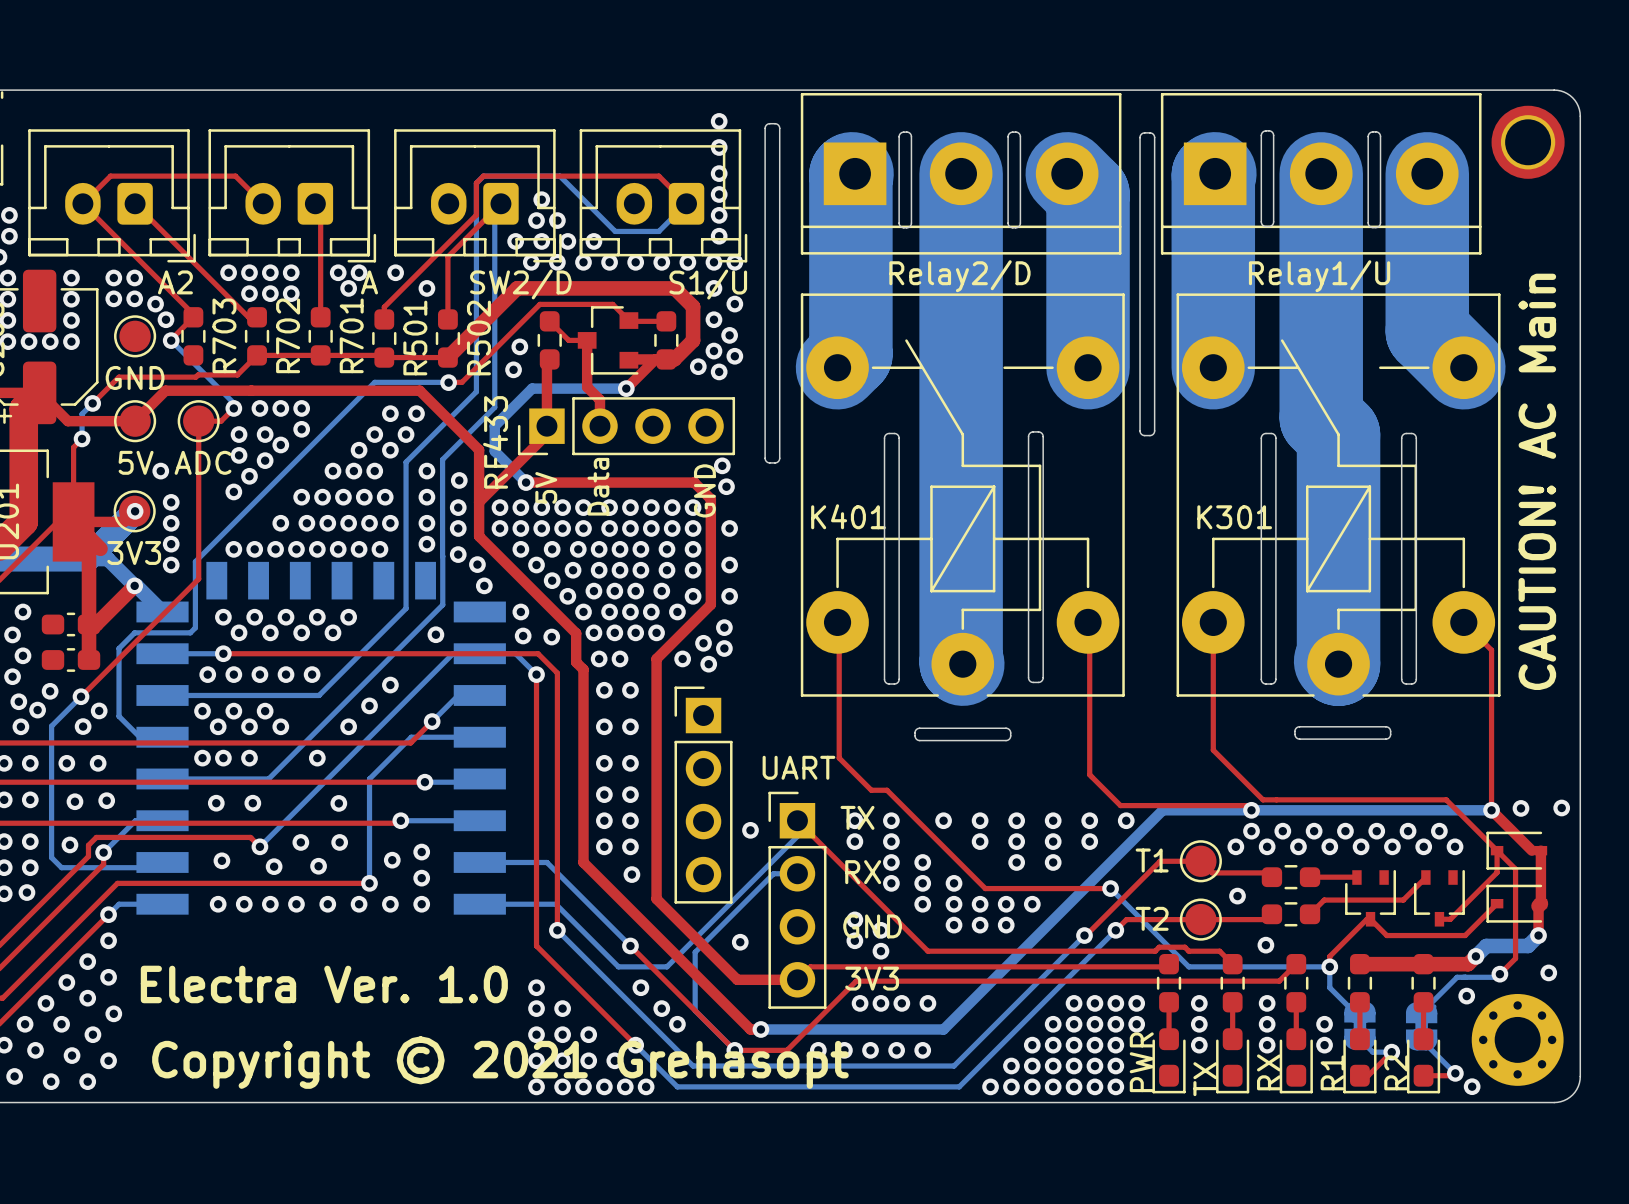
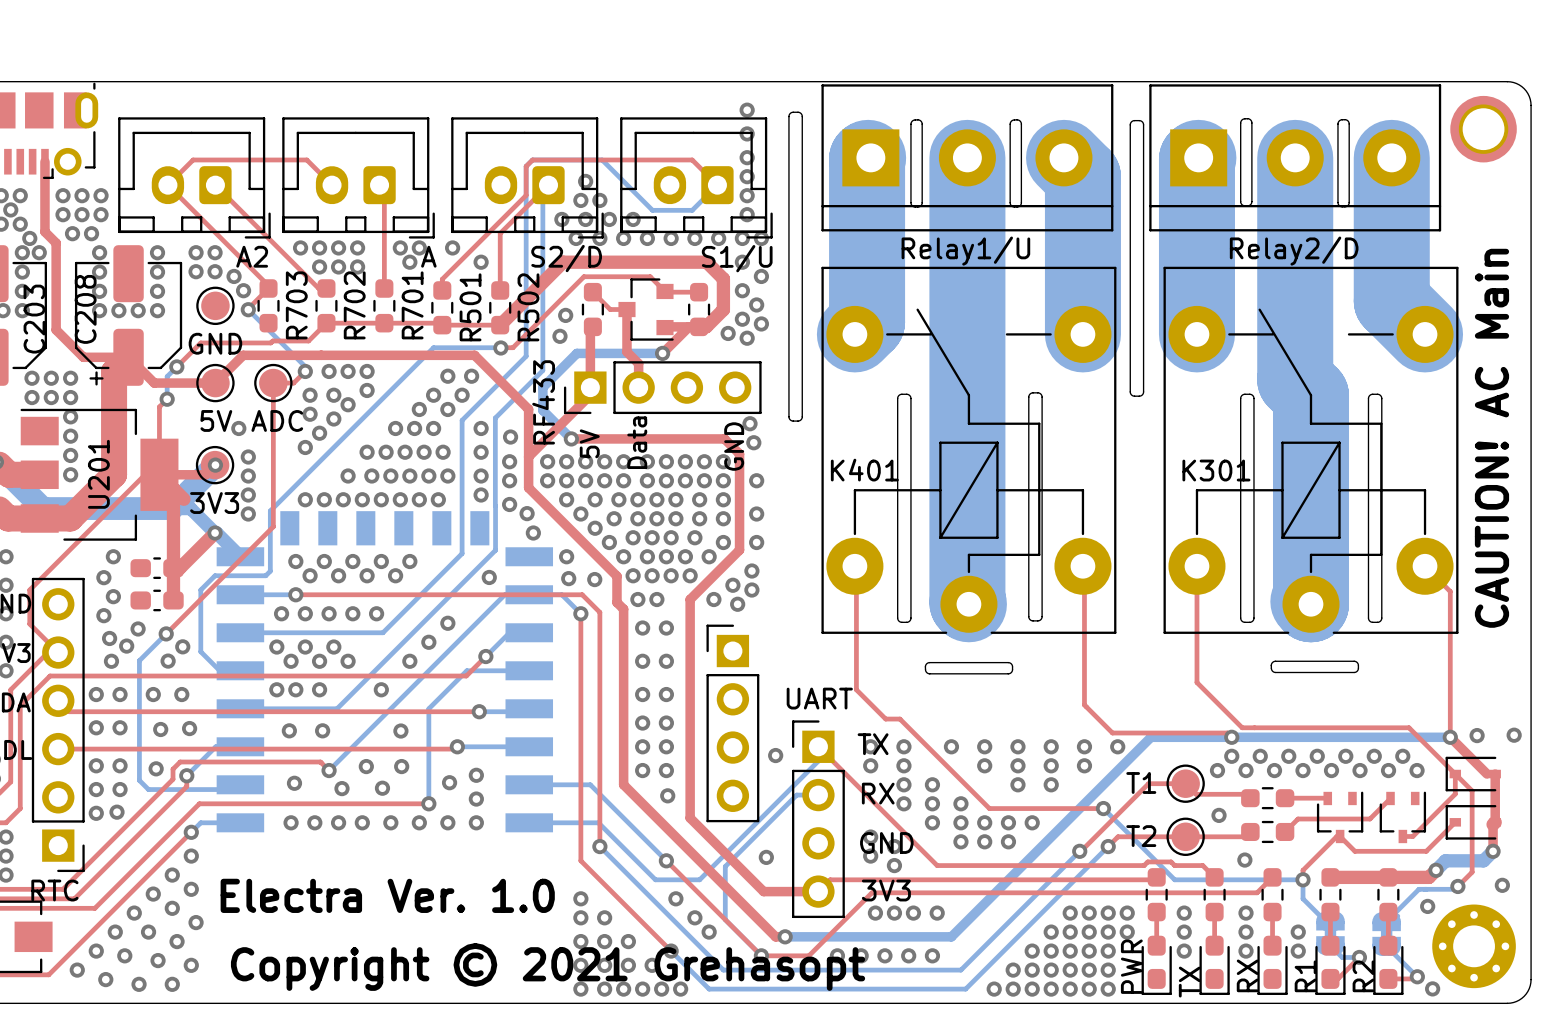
part value: Relay2/D (959, 276) -> Relay1/U (965, 251)
part value: Relay1/U (1319, 276) -> Relay2/D (1294, 251)
part value: SW2/D (520, 284) -> S2/D (566, 258)

